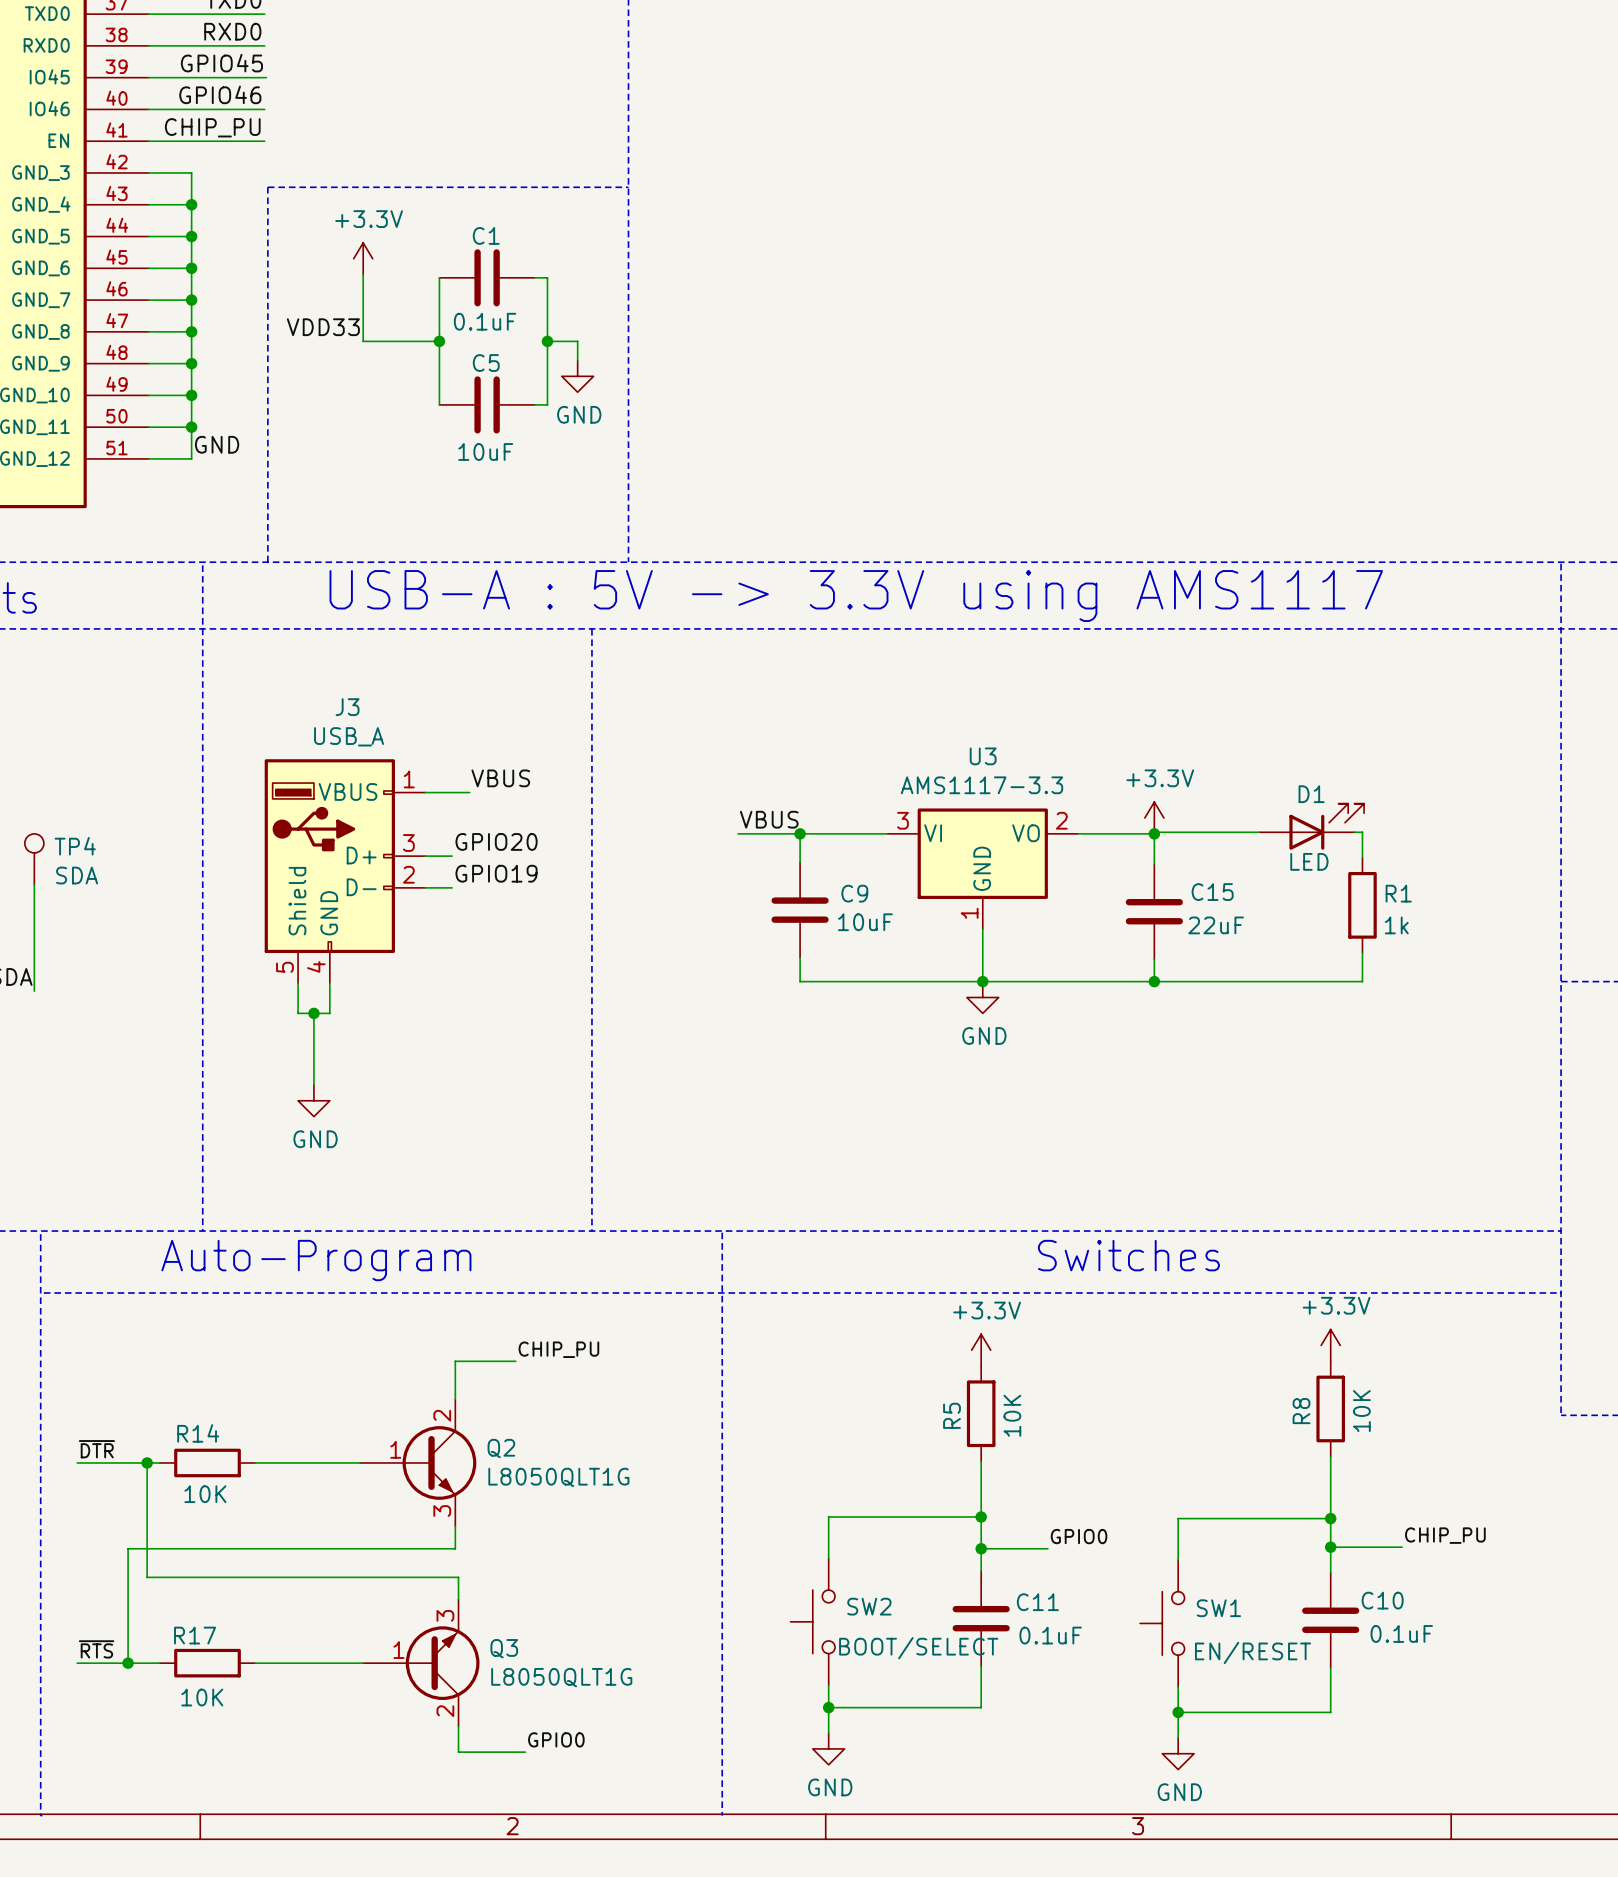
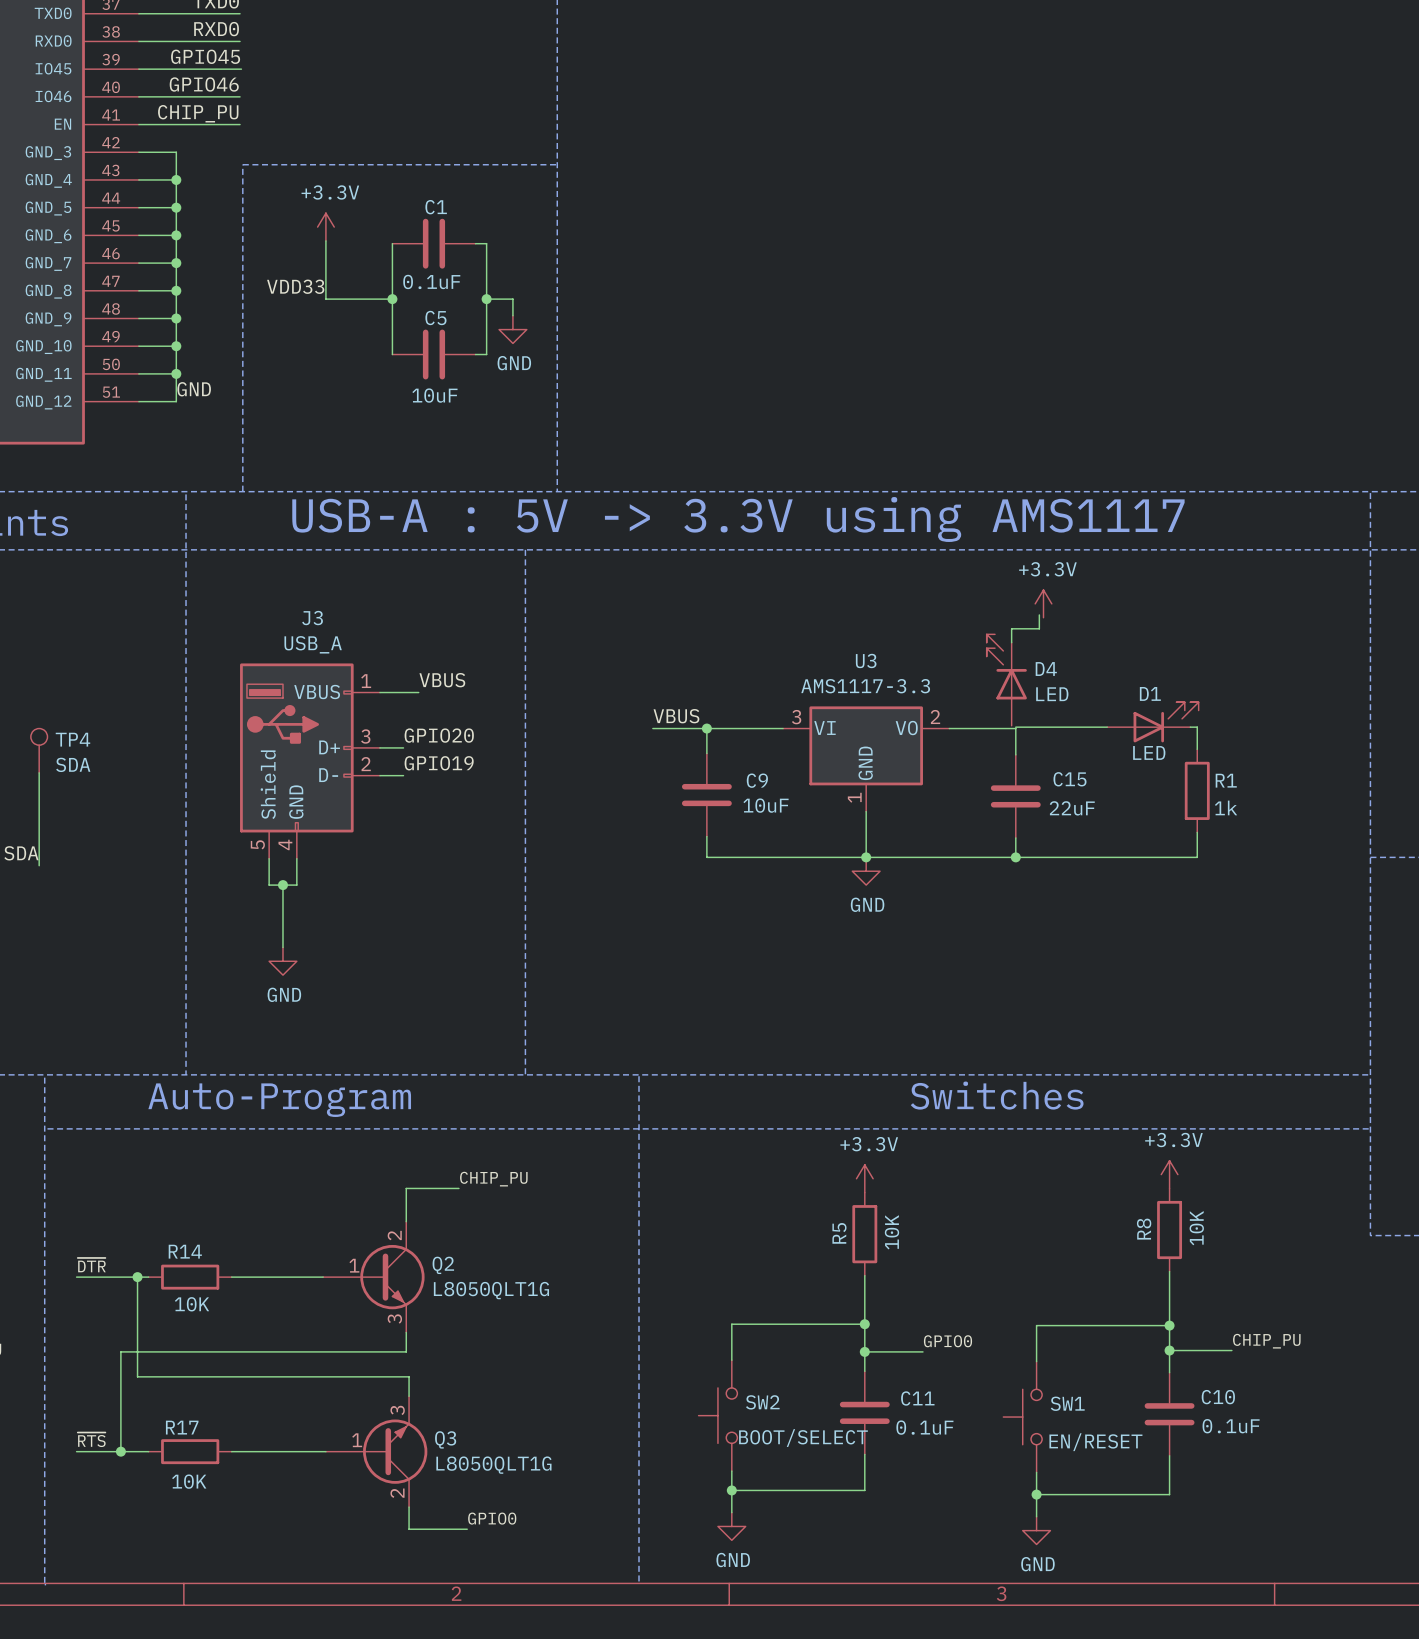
wire: none -> (1039, 614) (1039, 628) (1011, 628) (1011, 642)
D4: none -> LED (1006, 680)
power symbol position: +3.3V (1154, 817) -> +3.3V (1043, 603)
junction: (1154, 833) -> none

